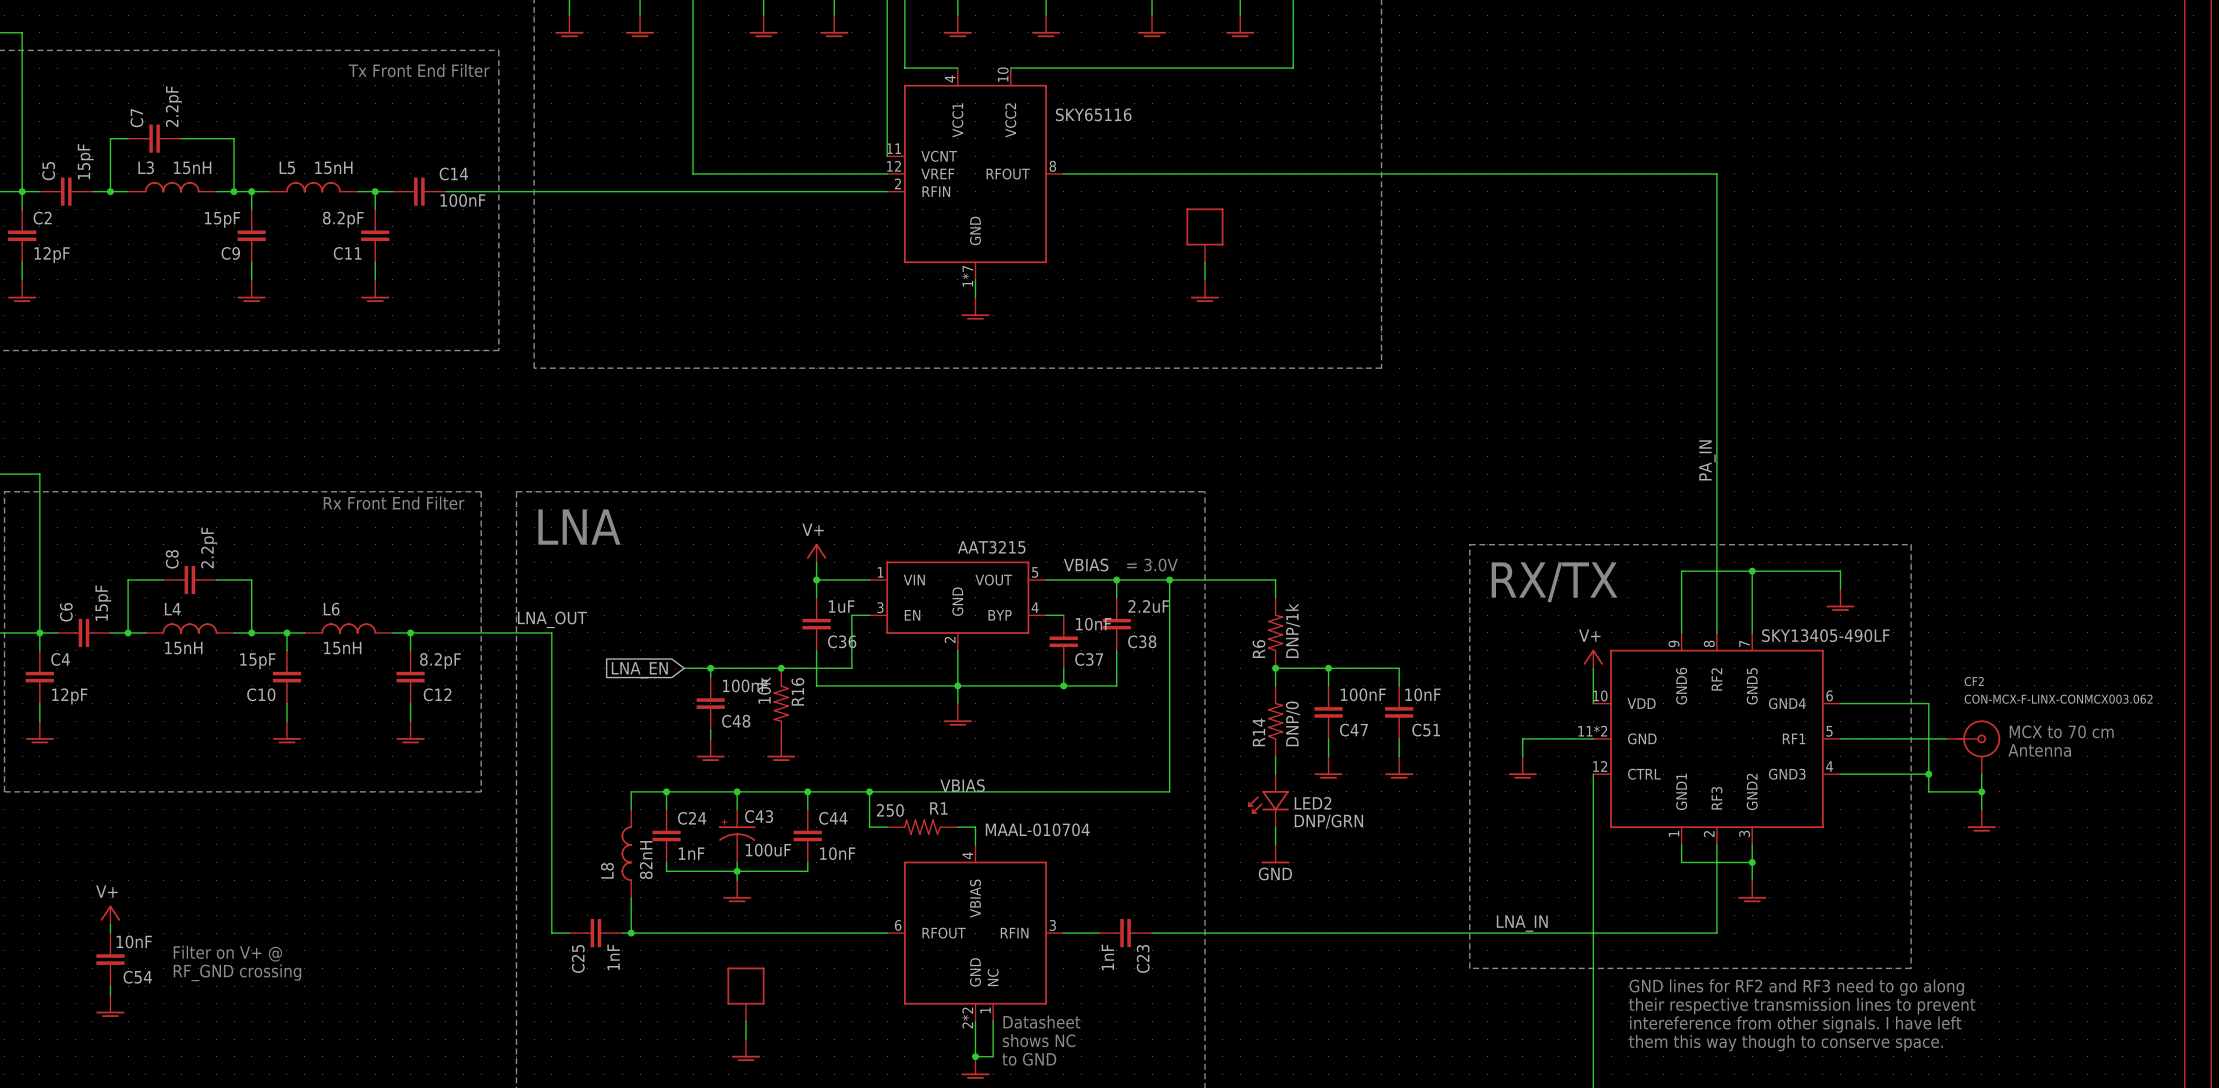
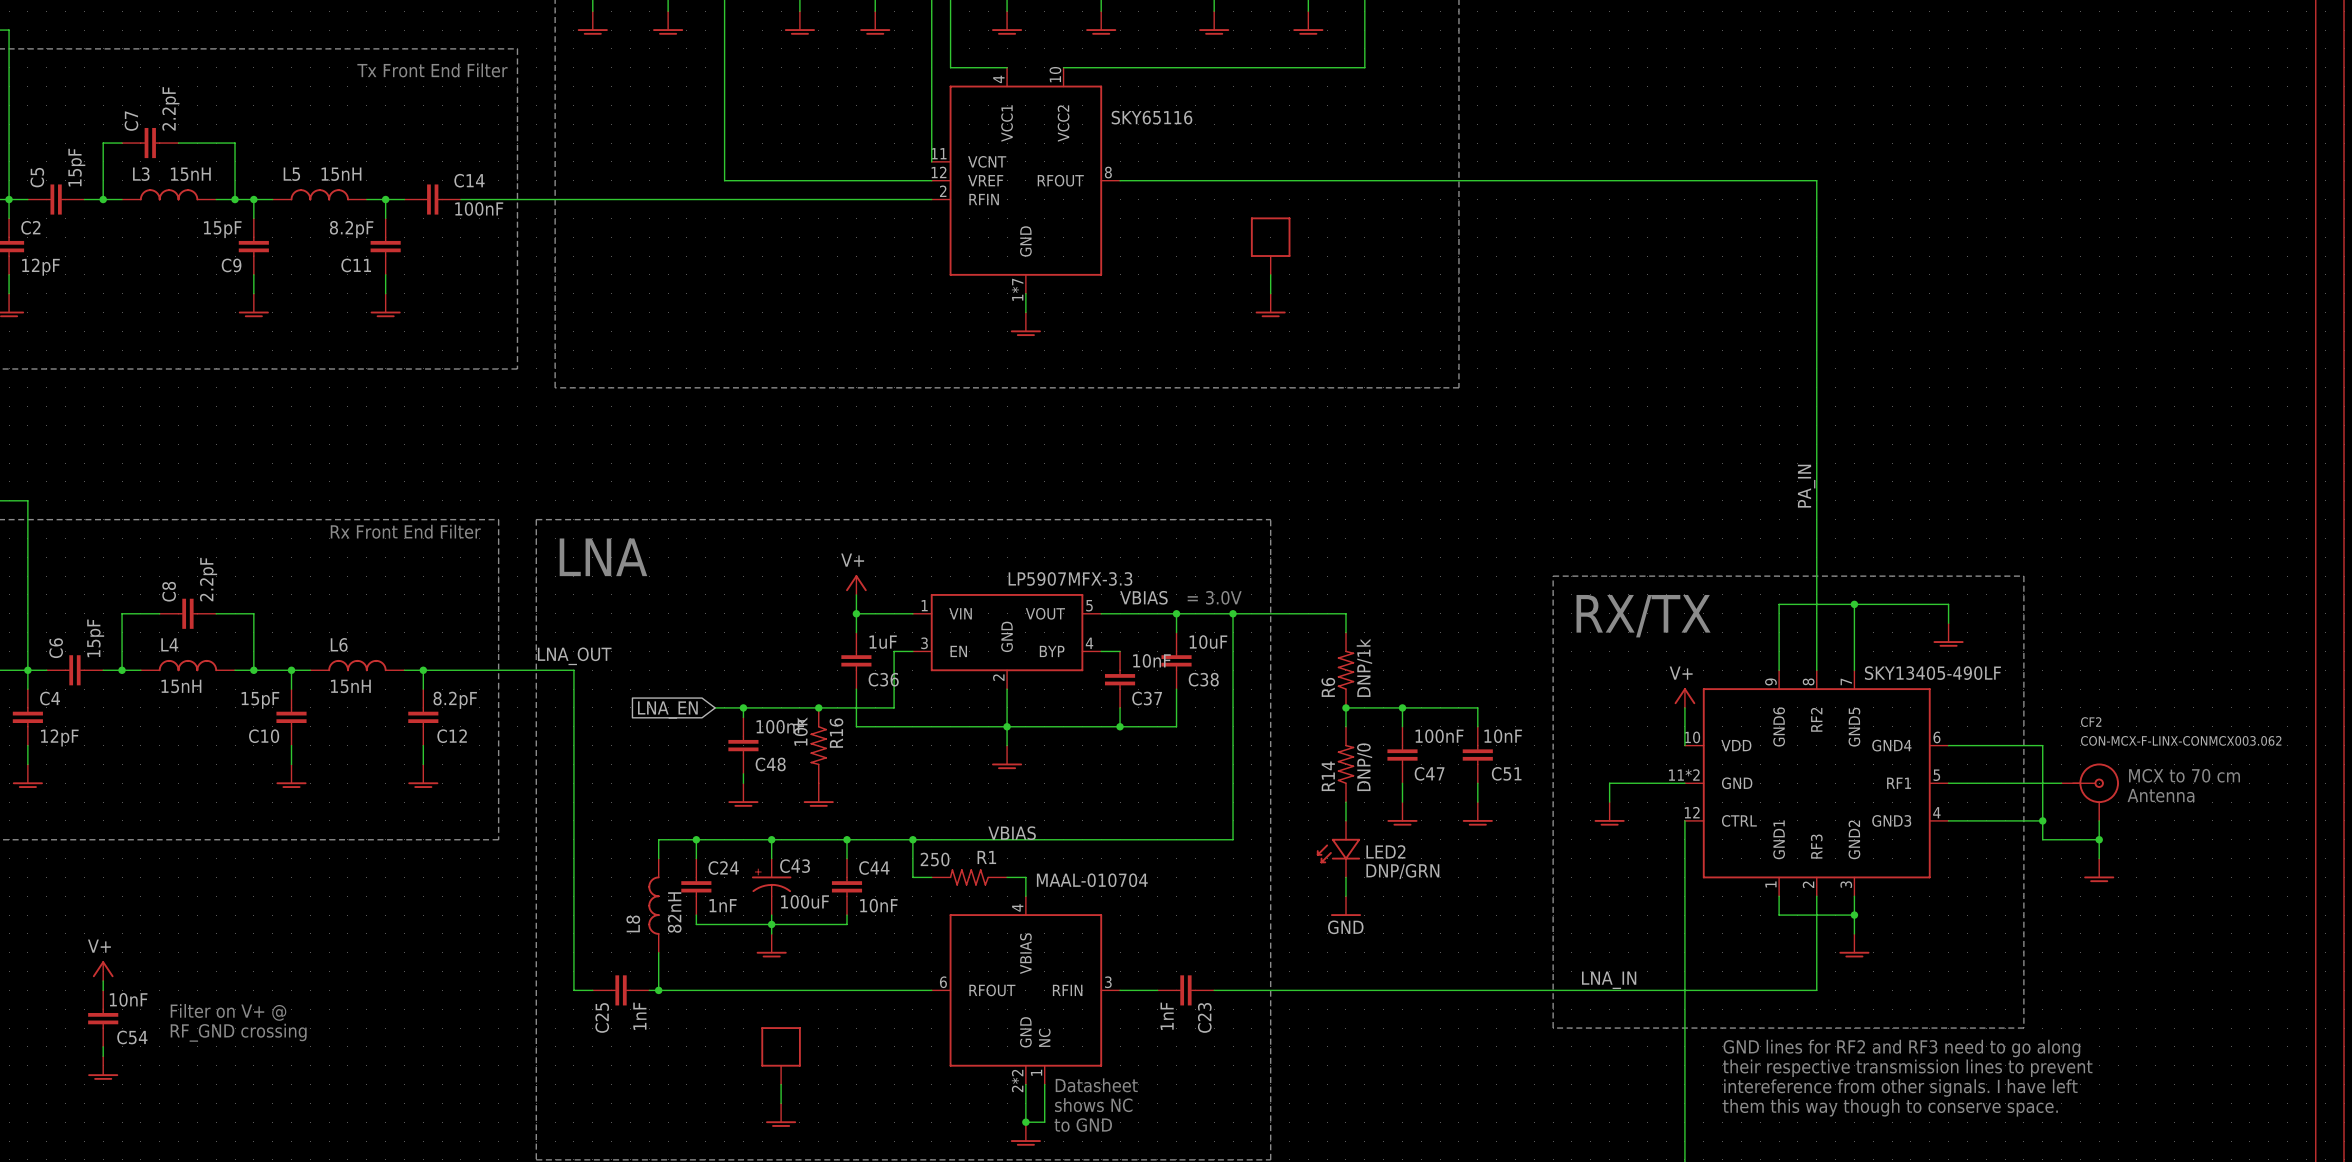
part value: AAT3215 (991, 547) -> LP5907MFX-3.3 (1070, 578)
C38 value: 2.2uF (1148, 606) -> 10uF (1208, 642)

